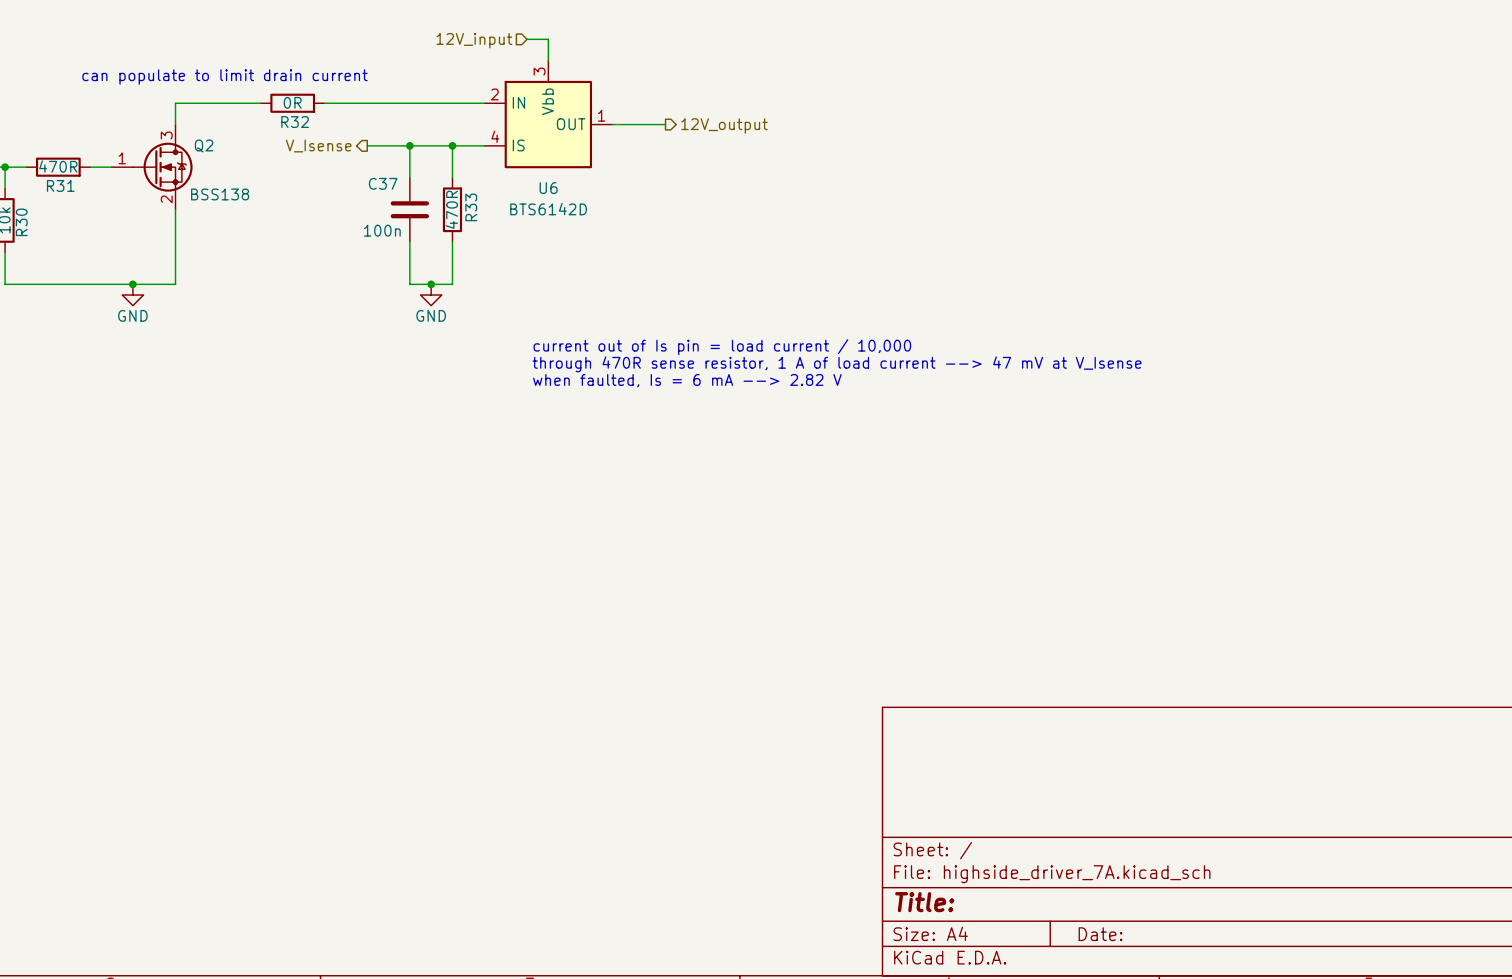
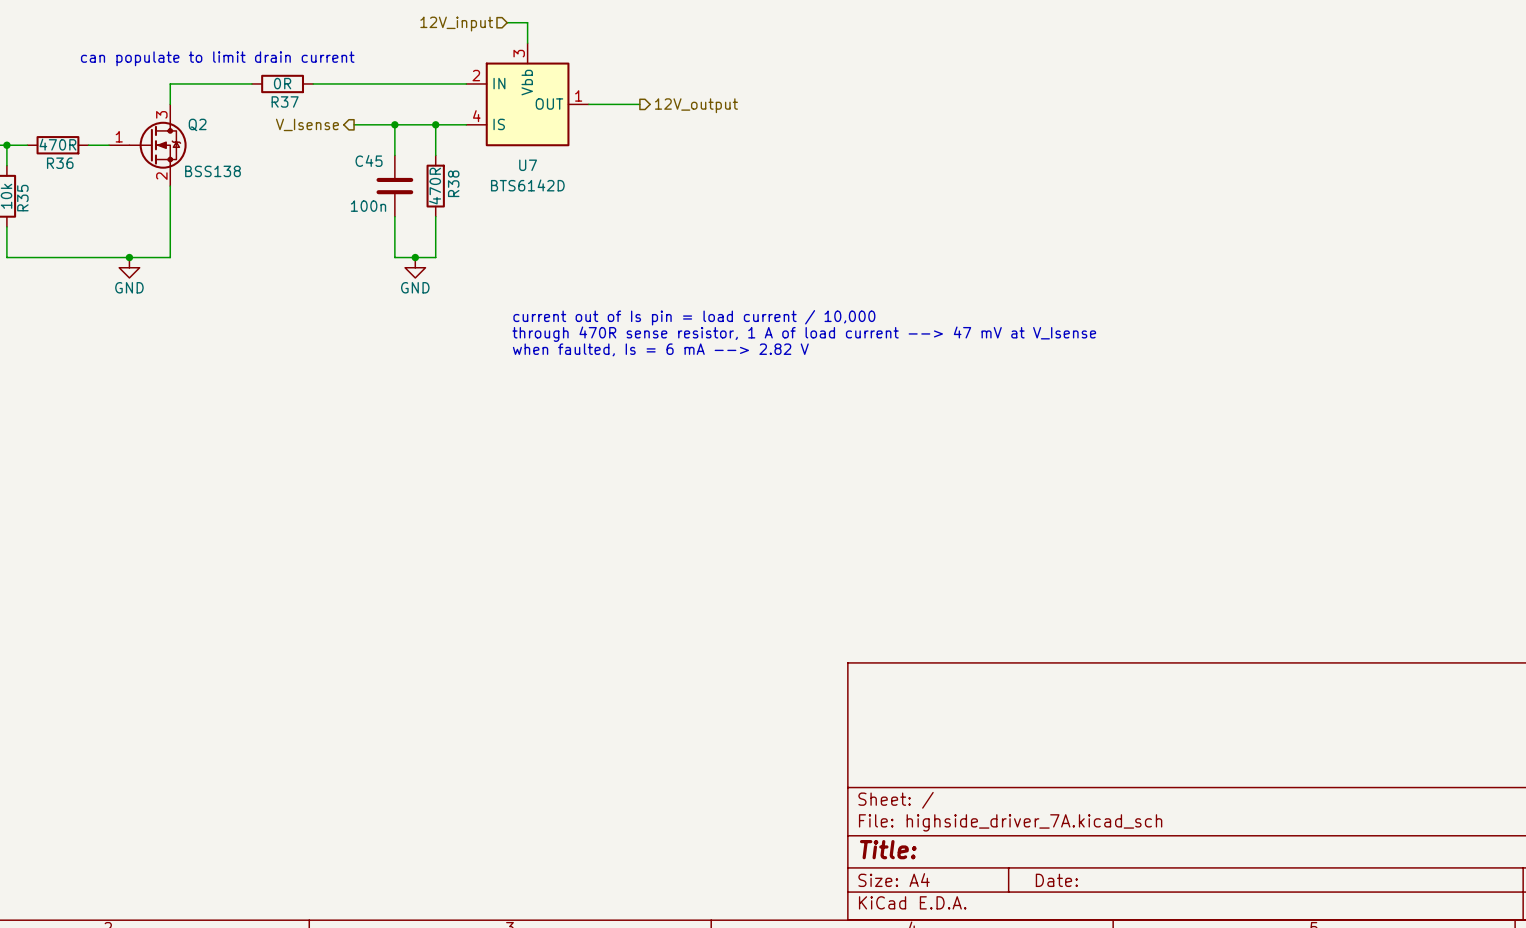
R32 name: R32 (295, 122) -> R37 (285, 101)
C37 name: C37 (383, 183) -> C45 (369, 160)
R31 name: R31 (60, 185) -> R36 (60, 163)
U6 name: U6 (548, 188) -> U7 (528, 165)
R33 name: R33 (471, 207) -> R38 (453, 183)
R30 name: R30 (21, 222) -> R35 (22, 198)

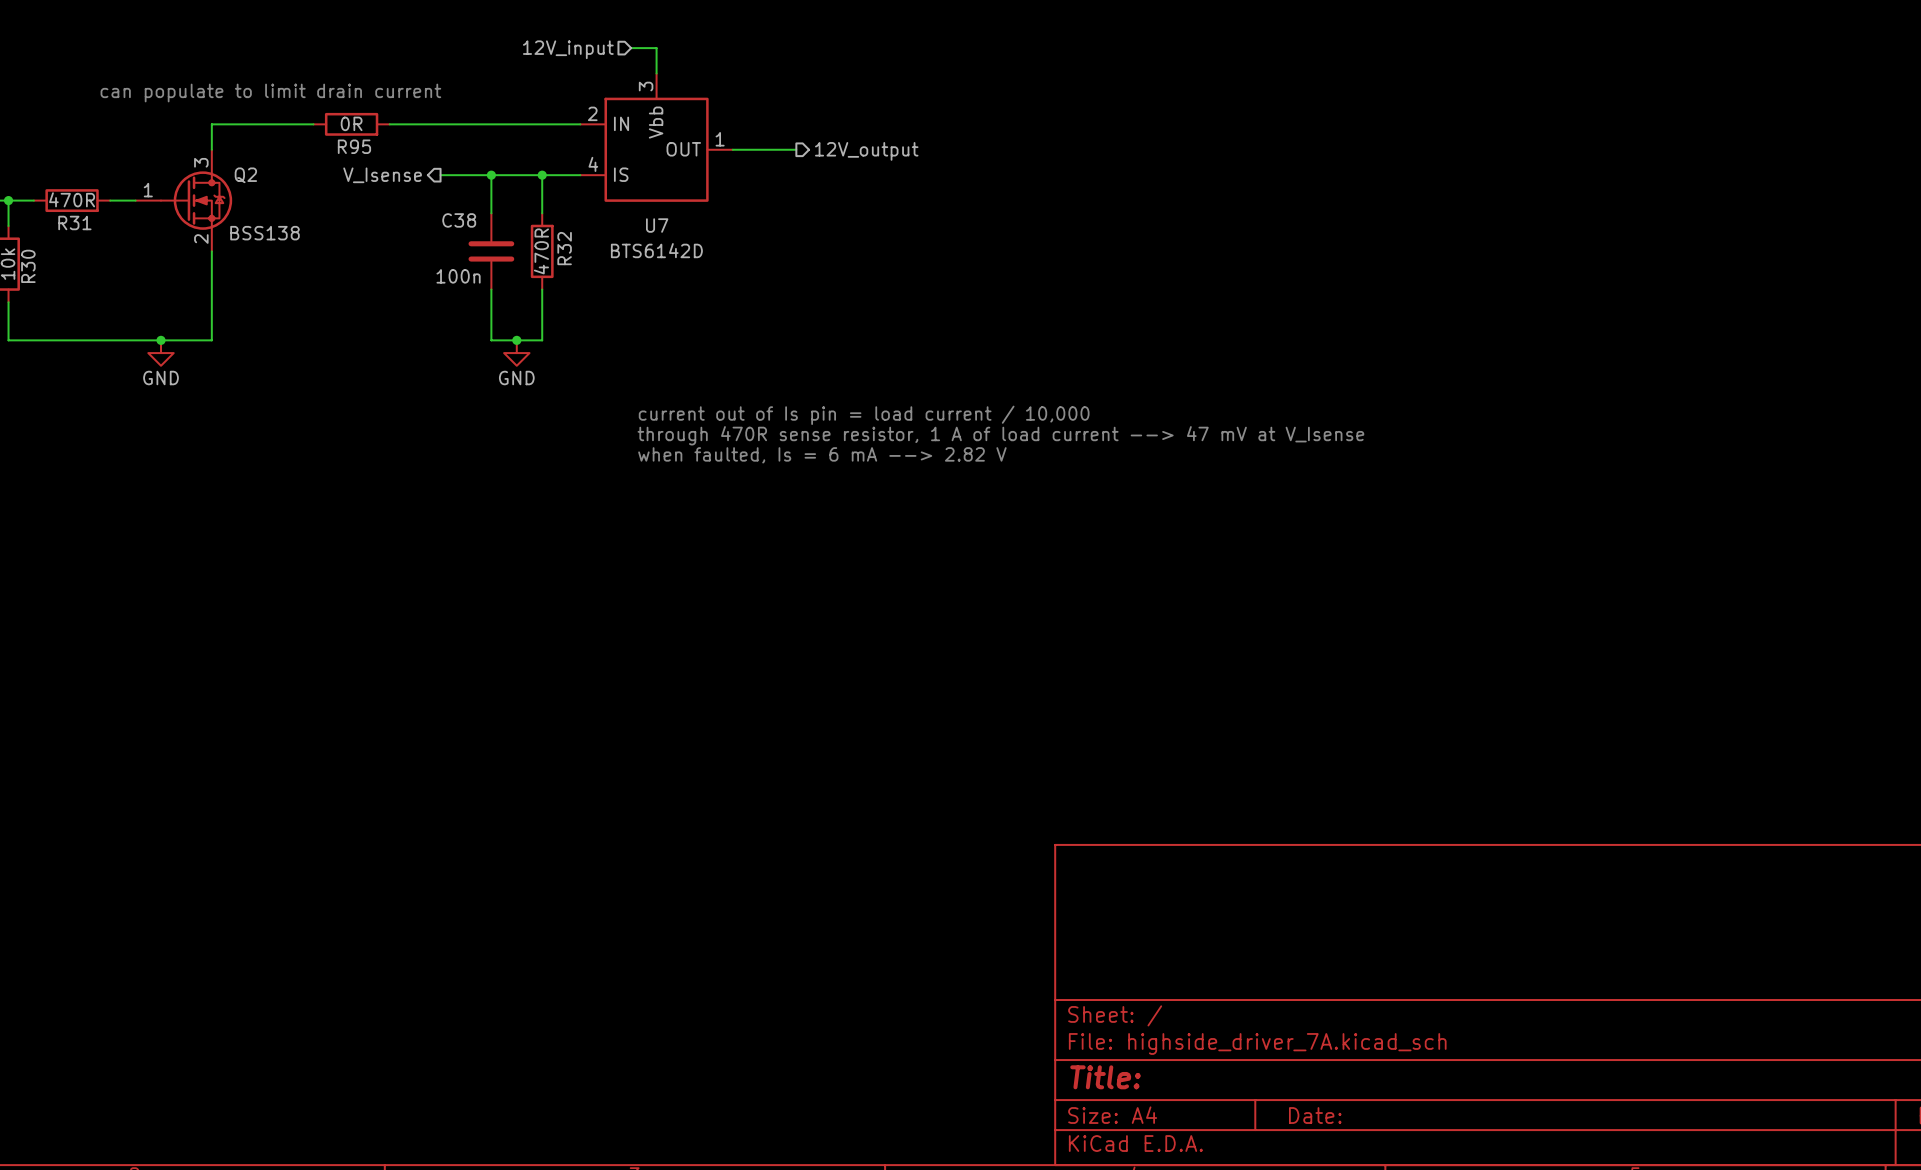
R37 name: R37 (285, 101) -> R95 (354, 146)
C45 name: C45 (369, 160) -> C38 (459, 220)
R36 name: R36 (60, 163) -> R31 (74, 222)
R38 name: R38 (453, 183) -> R32 (564, 248)
R35 name: R35 (22, 198) -> R30 (28, 266)

